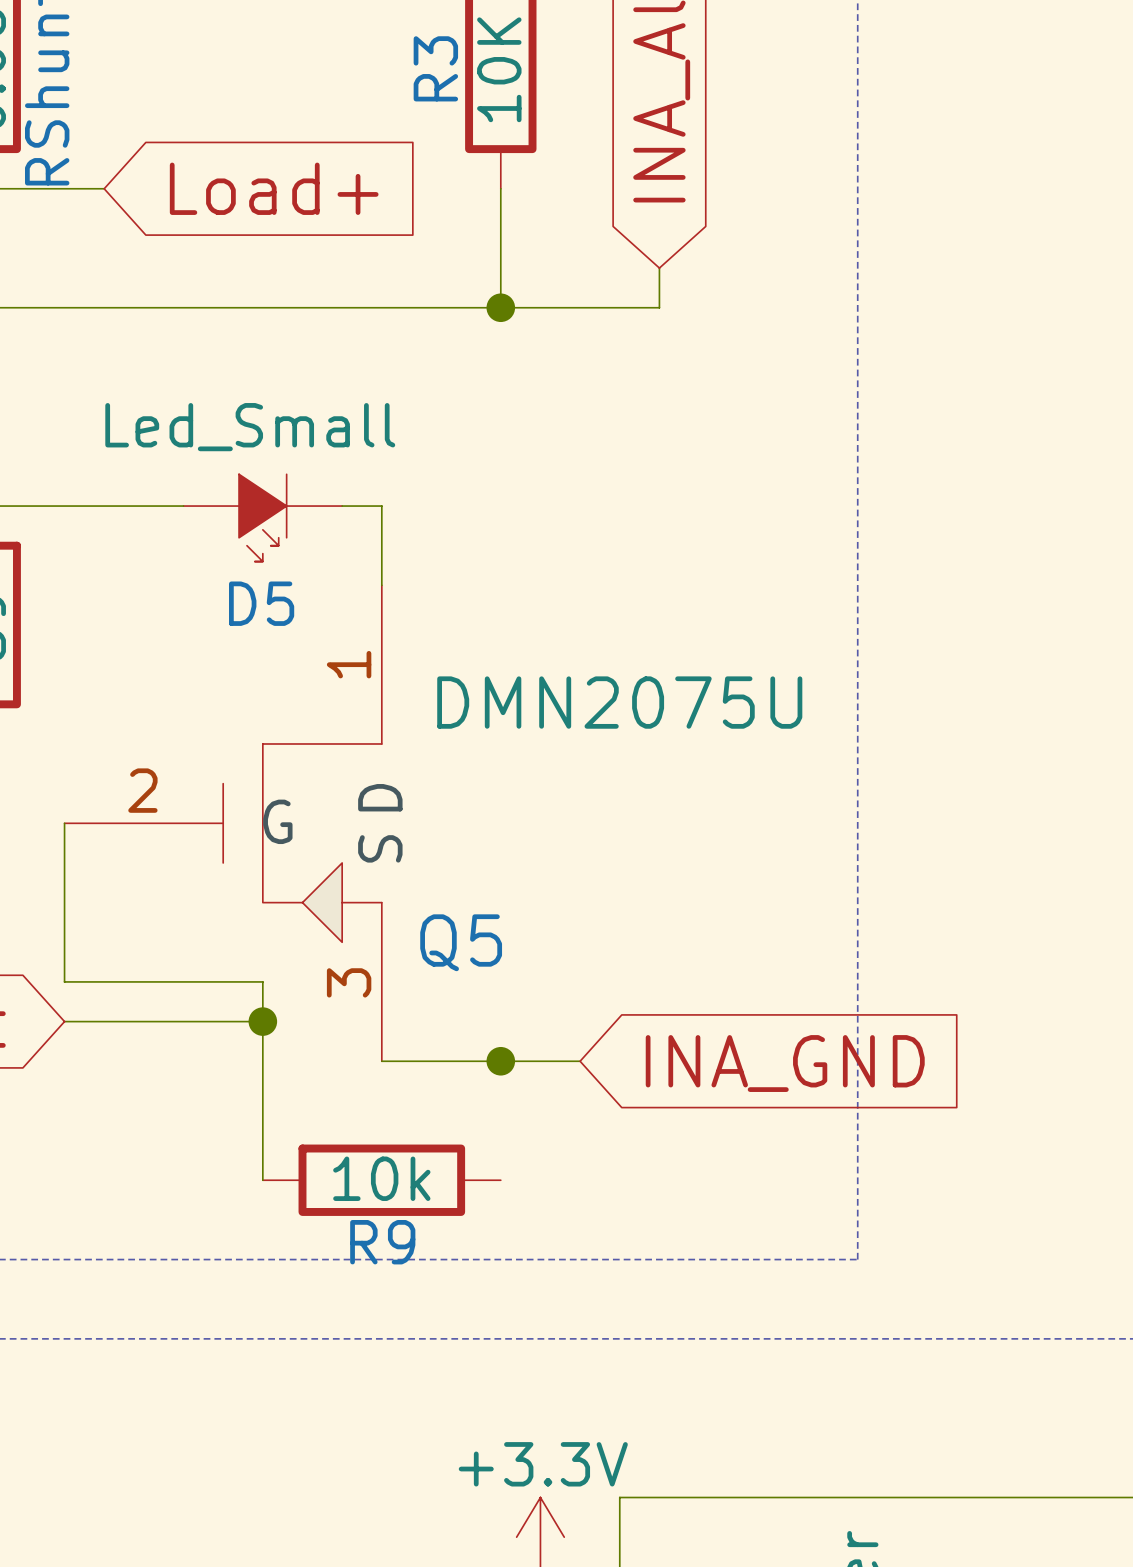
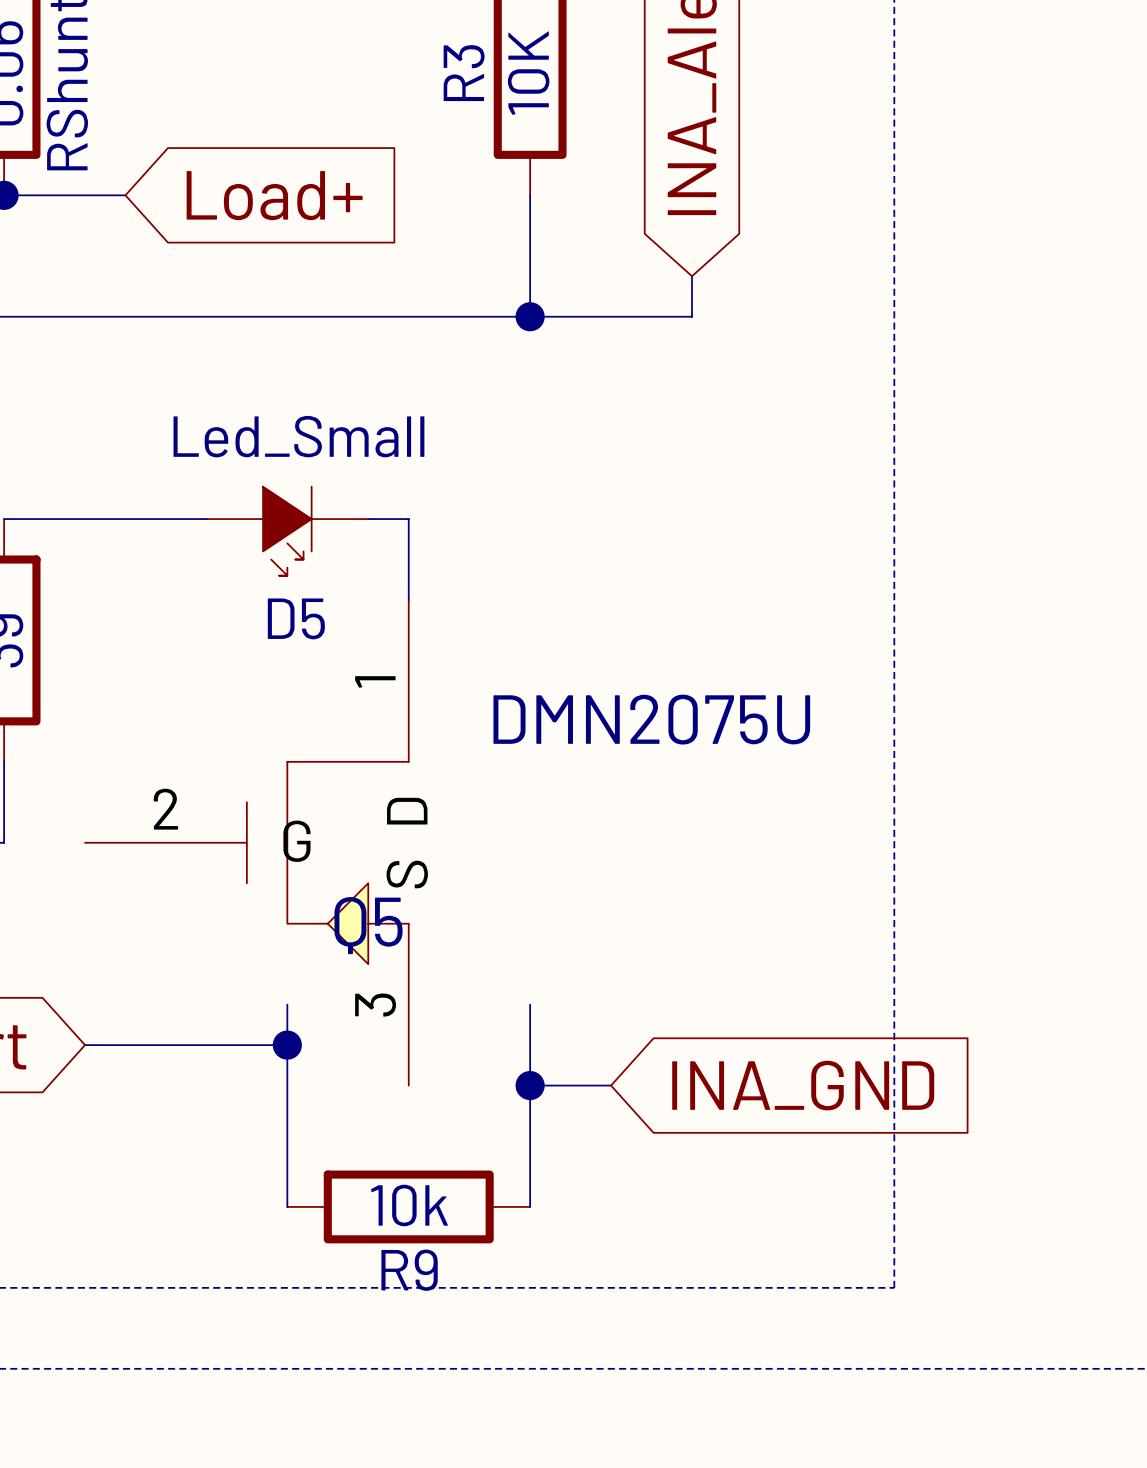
wire: (64, 823) (64, 981) (262, 981) -> none
Q5 name position: Q5 (461, 942) -> Q5 (368, 925)
wire: none -> (530, 1004) (530, 1206)
wire: (381, 1061) (500, 1061) -> none

